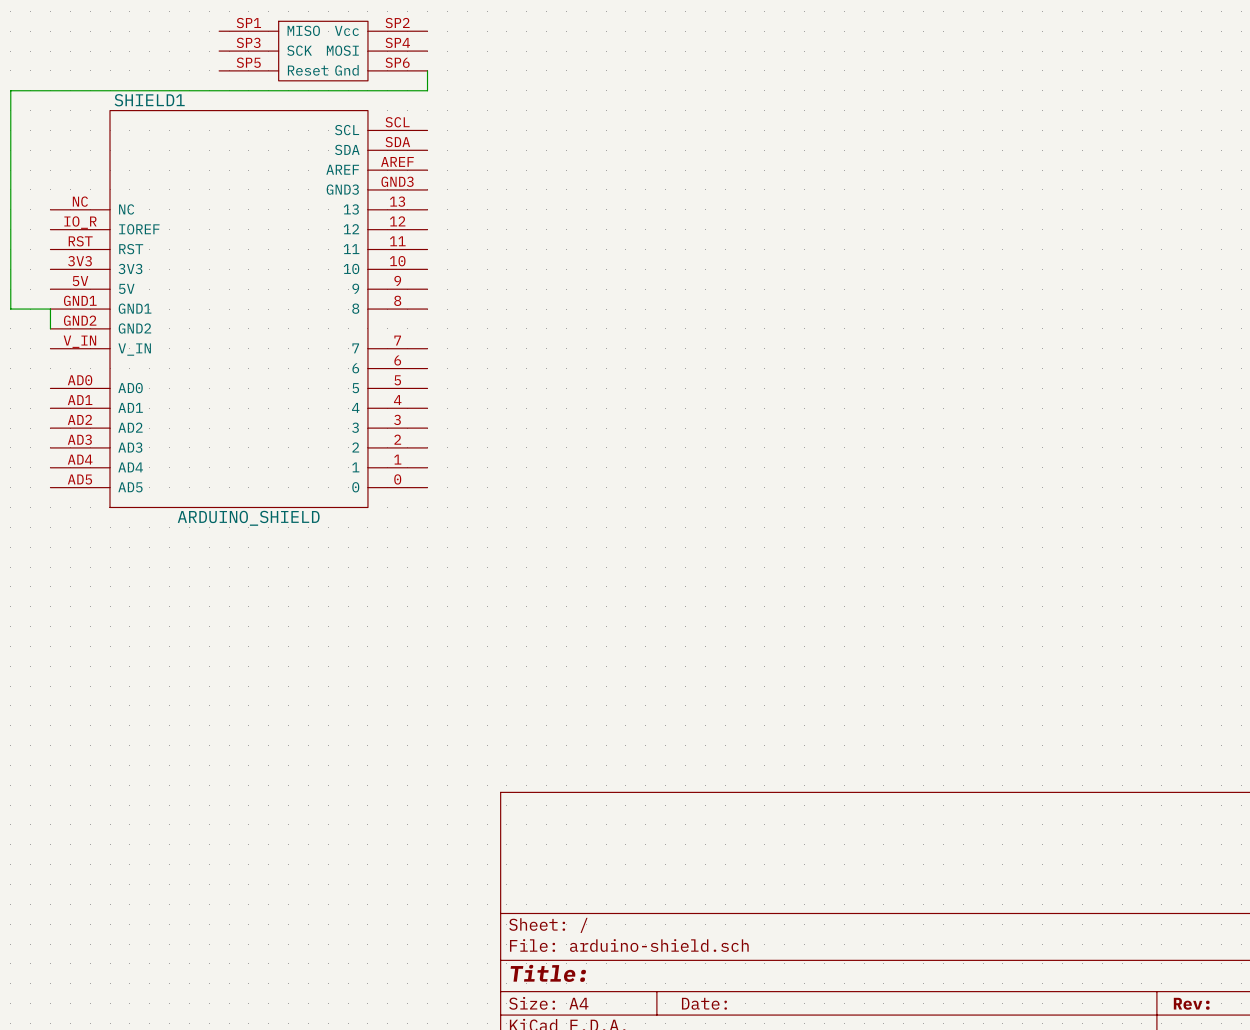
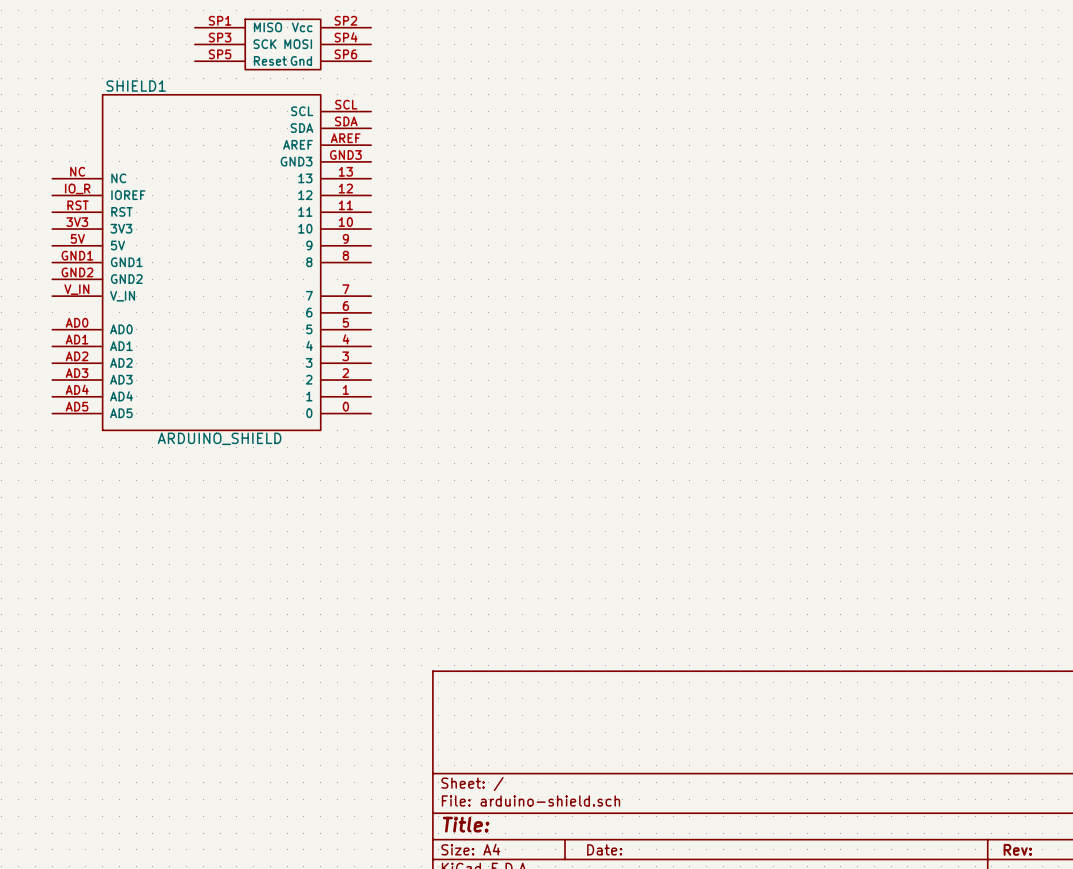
wire: (427, 70) (427, 90) (10, 90) (10, 309) (50, 309) (50, 328) -> none

